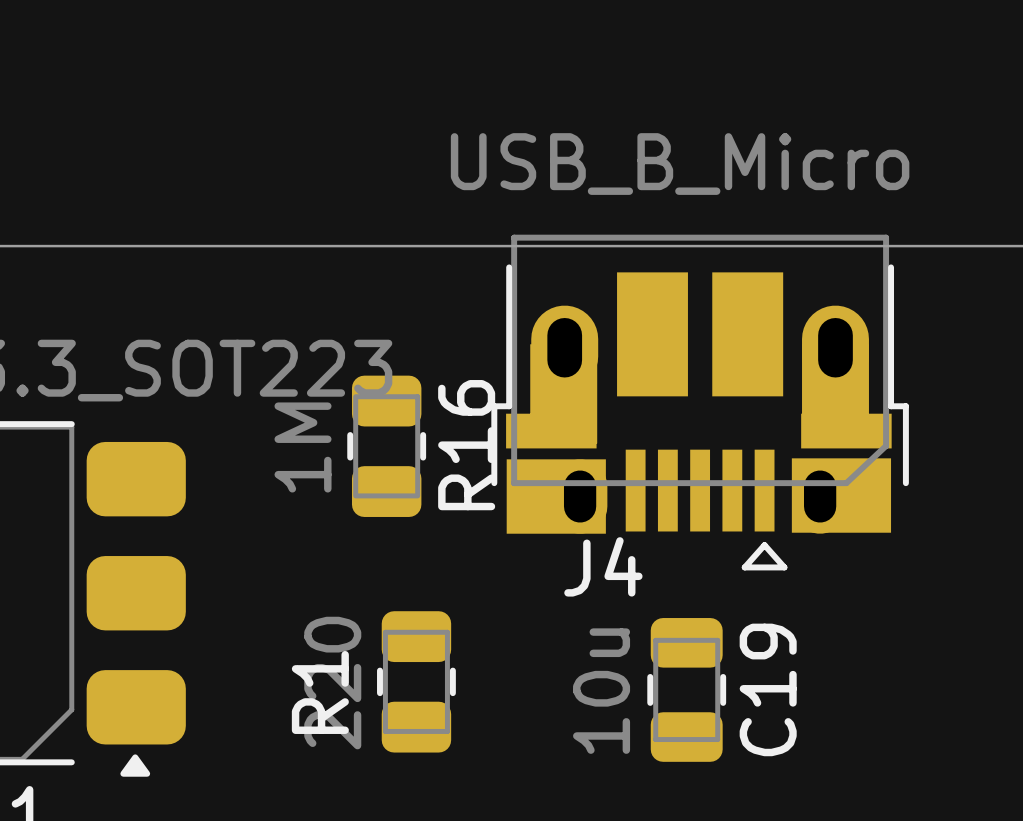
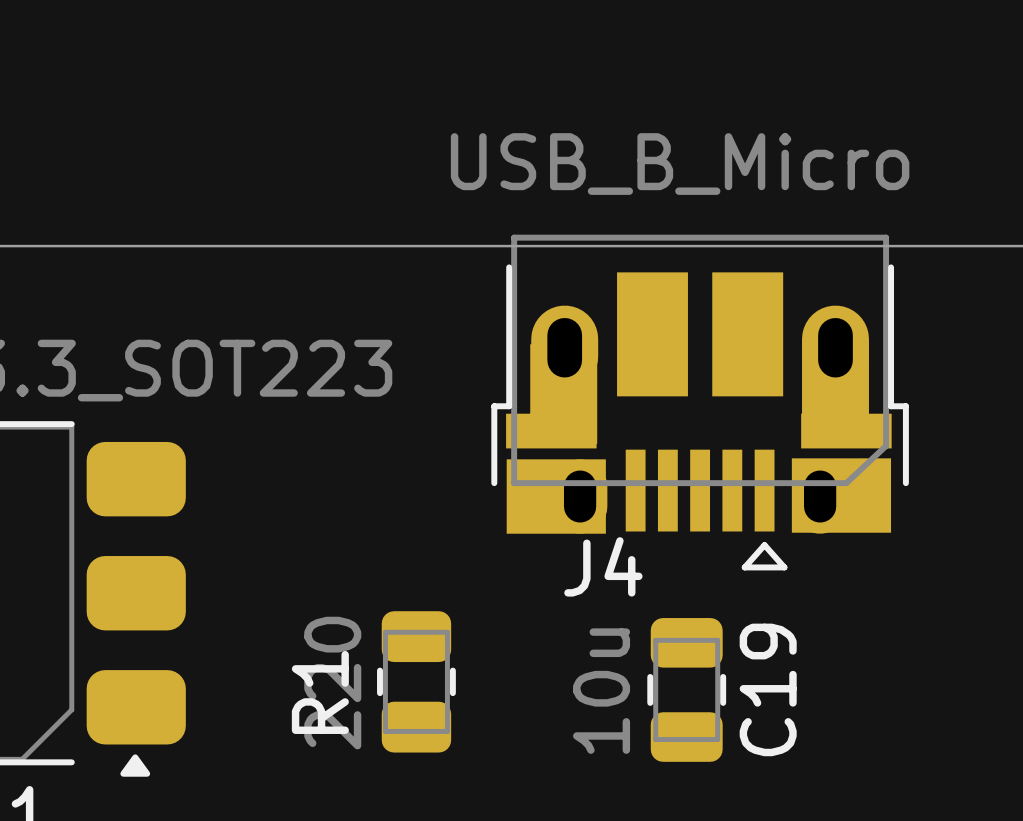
R16: 1M (386, 446) -> none

